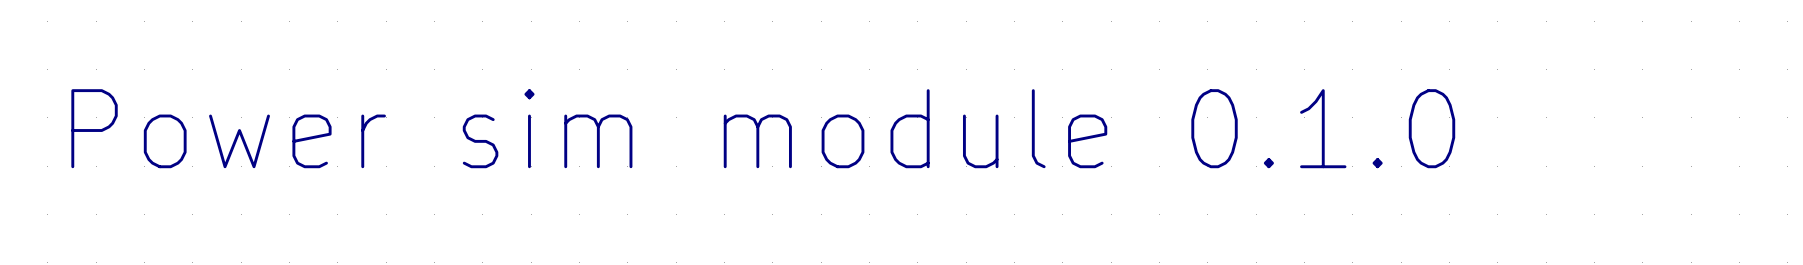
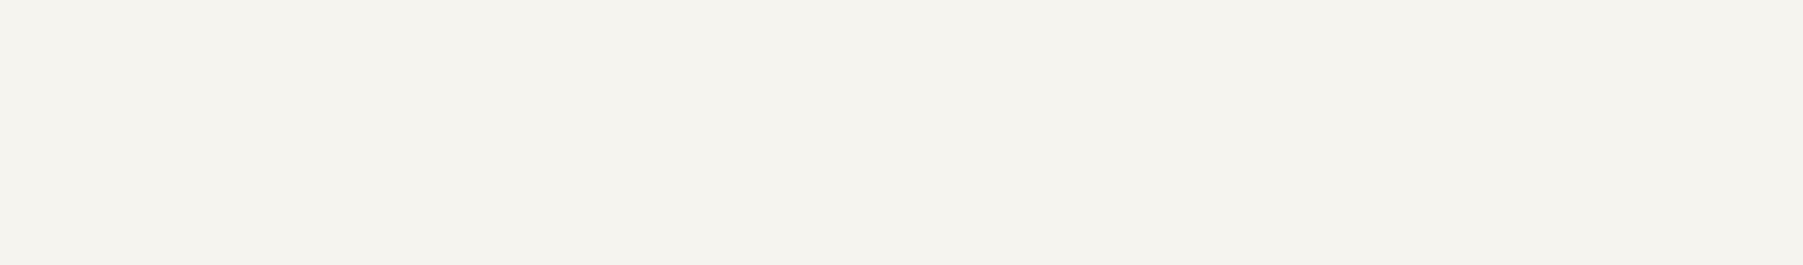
text: Power sim module 0.1.0 (763, 128) -> none

